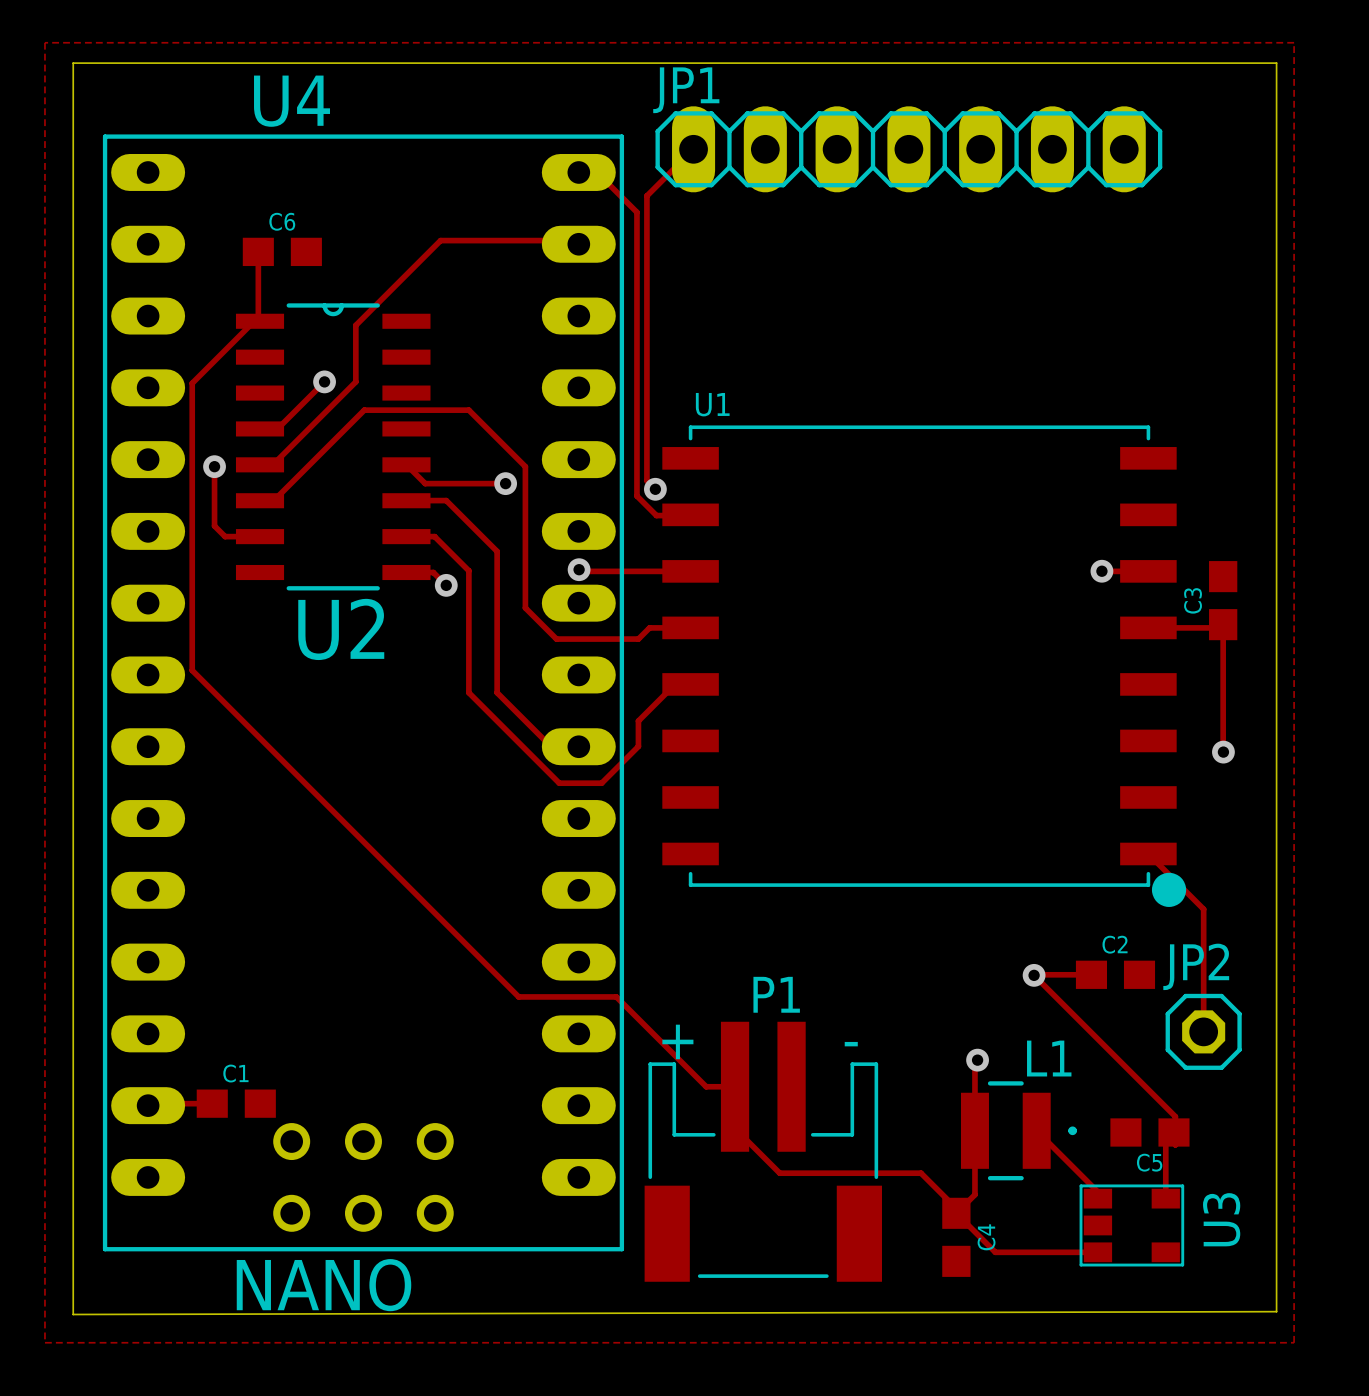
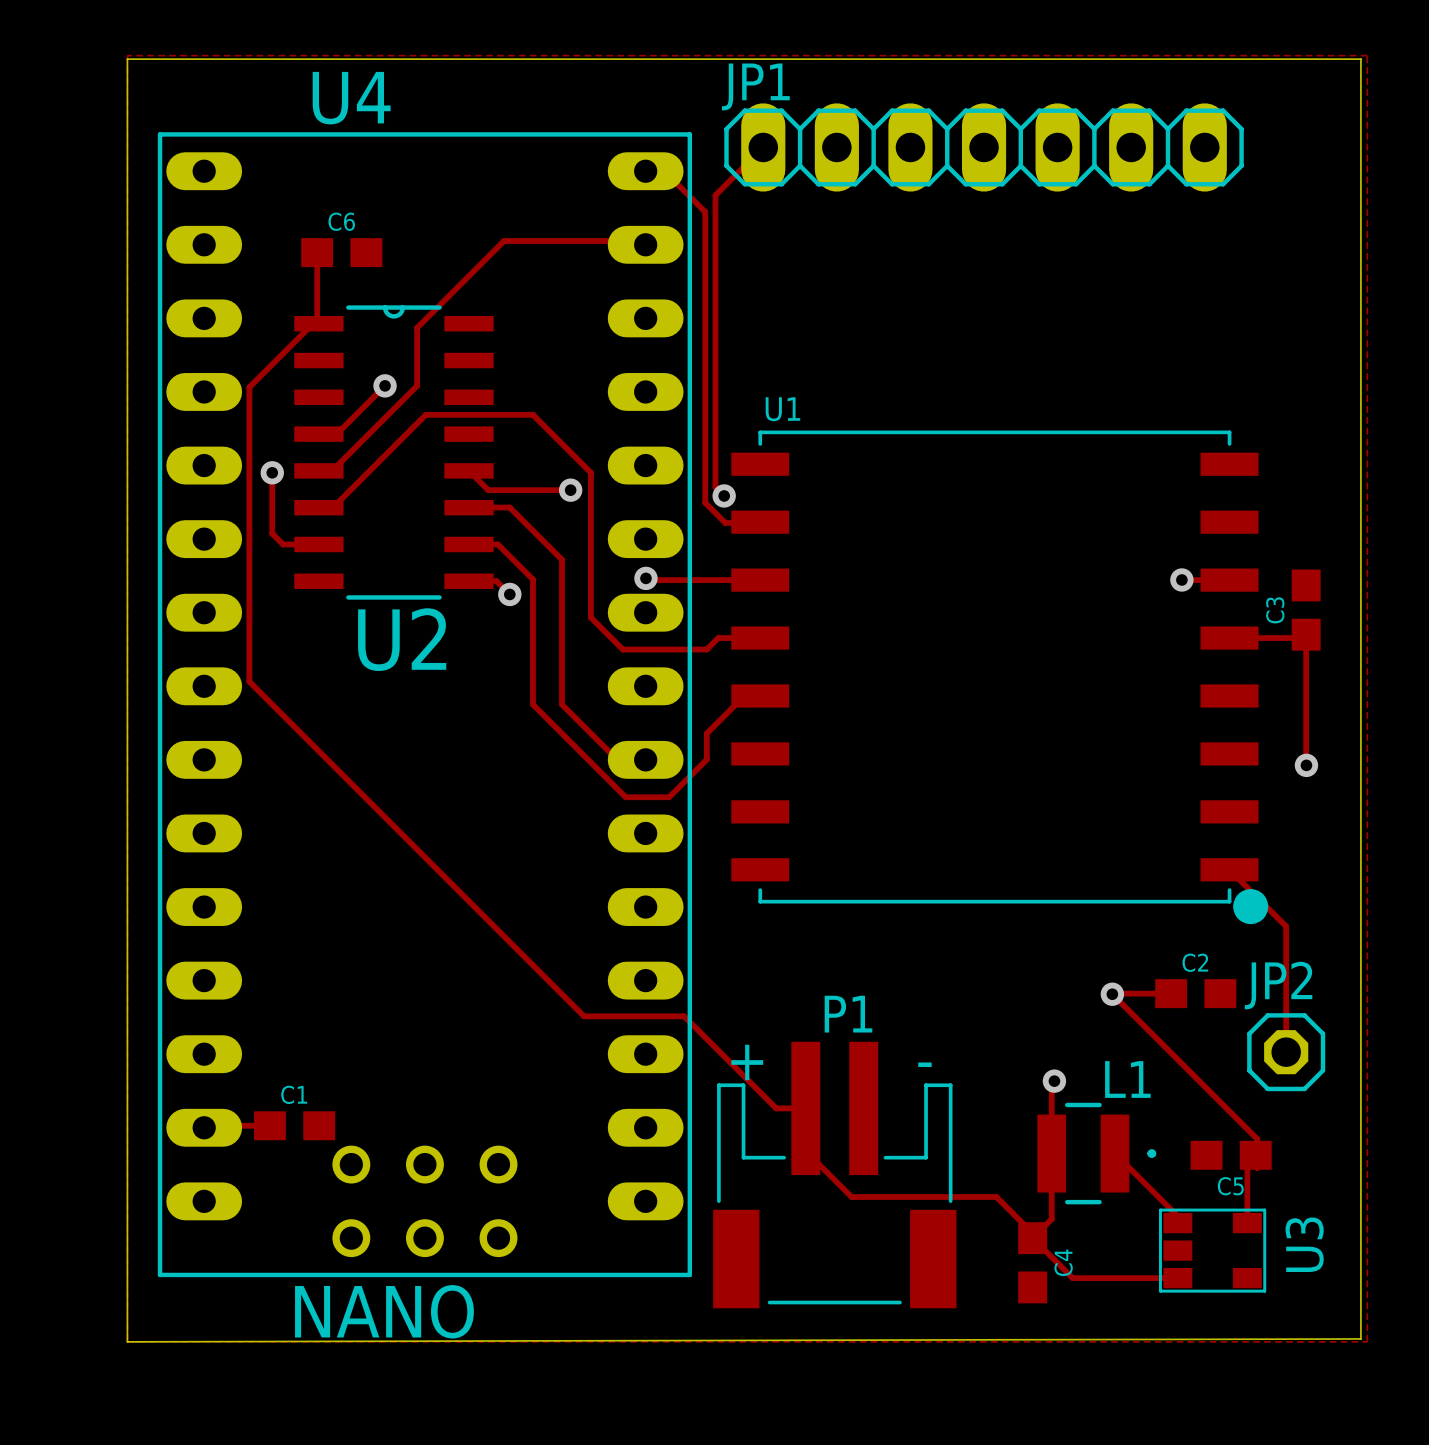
zone outline: (44, 42) (44, 1342) (1294, 1342) (1294, 42) (44, 42) -> (127, 55) (127, 1341) (1367, 1341) (1367, 55) (127, 55)

